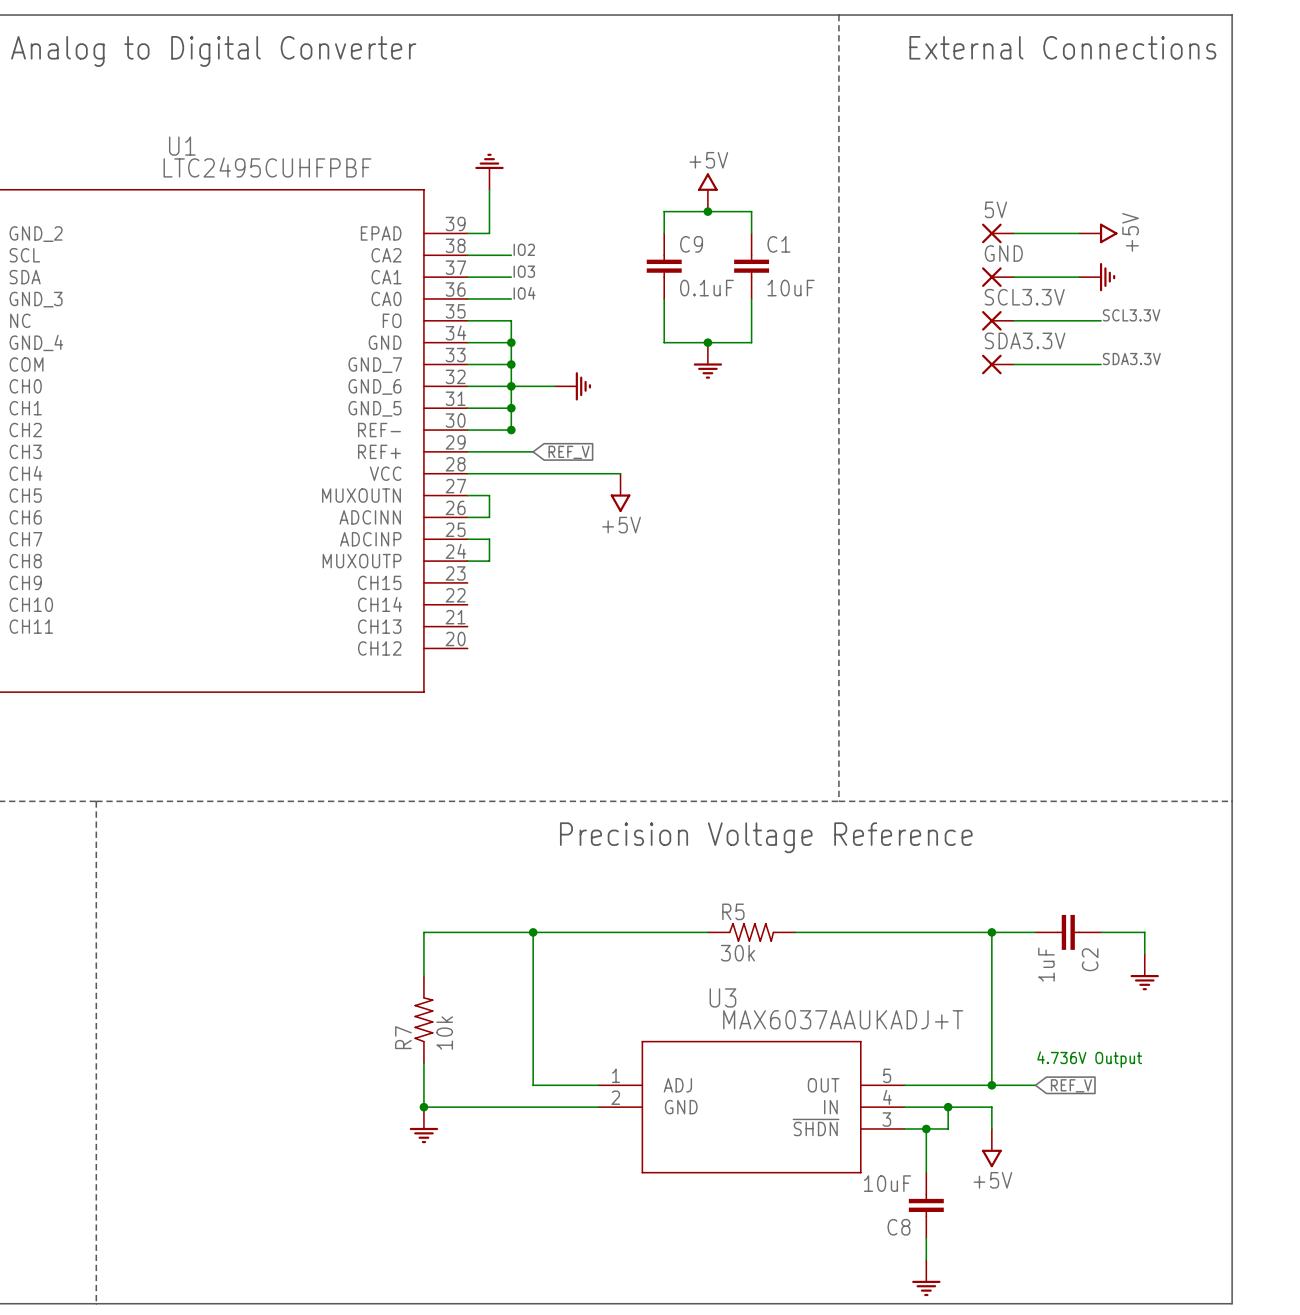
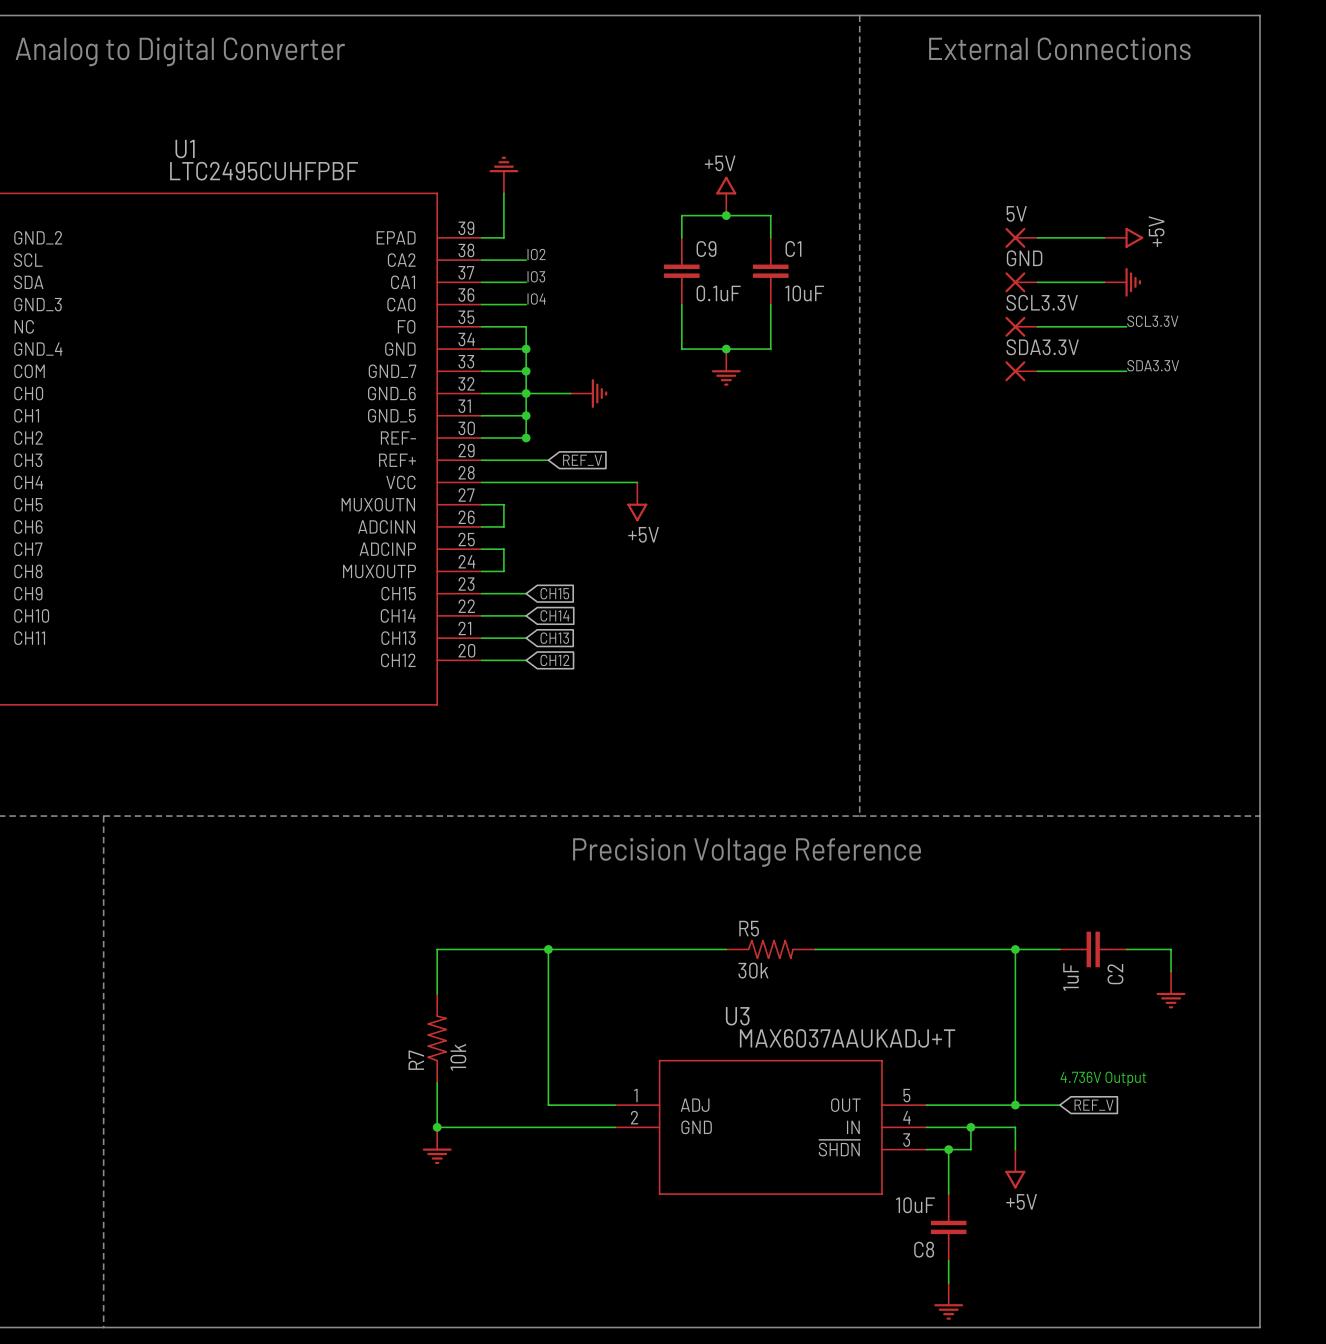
wire: none -> (481, 593) (526, 593)
global label: none -> CH15 (554, 593)
wire: none -> (481, 615) (526, 615)
global label: none -> CH14 (555, 615)
wire: none -> (481, 638) (526, 638)
global label: none -> CH13 (554, 638)
wire: none -> (481, 660) (526, 660)
global label: none -> CH12 (554, 660)

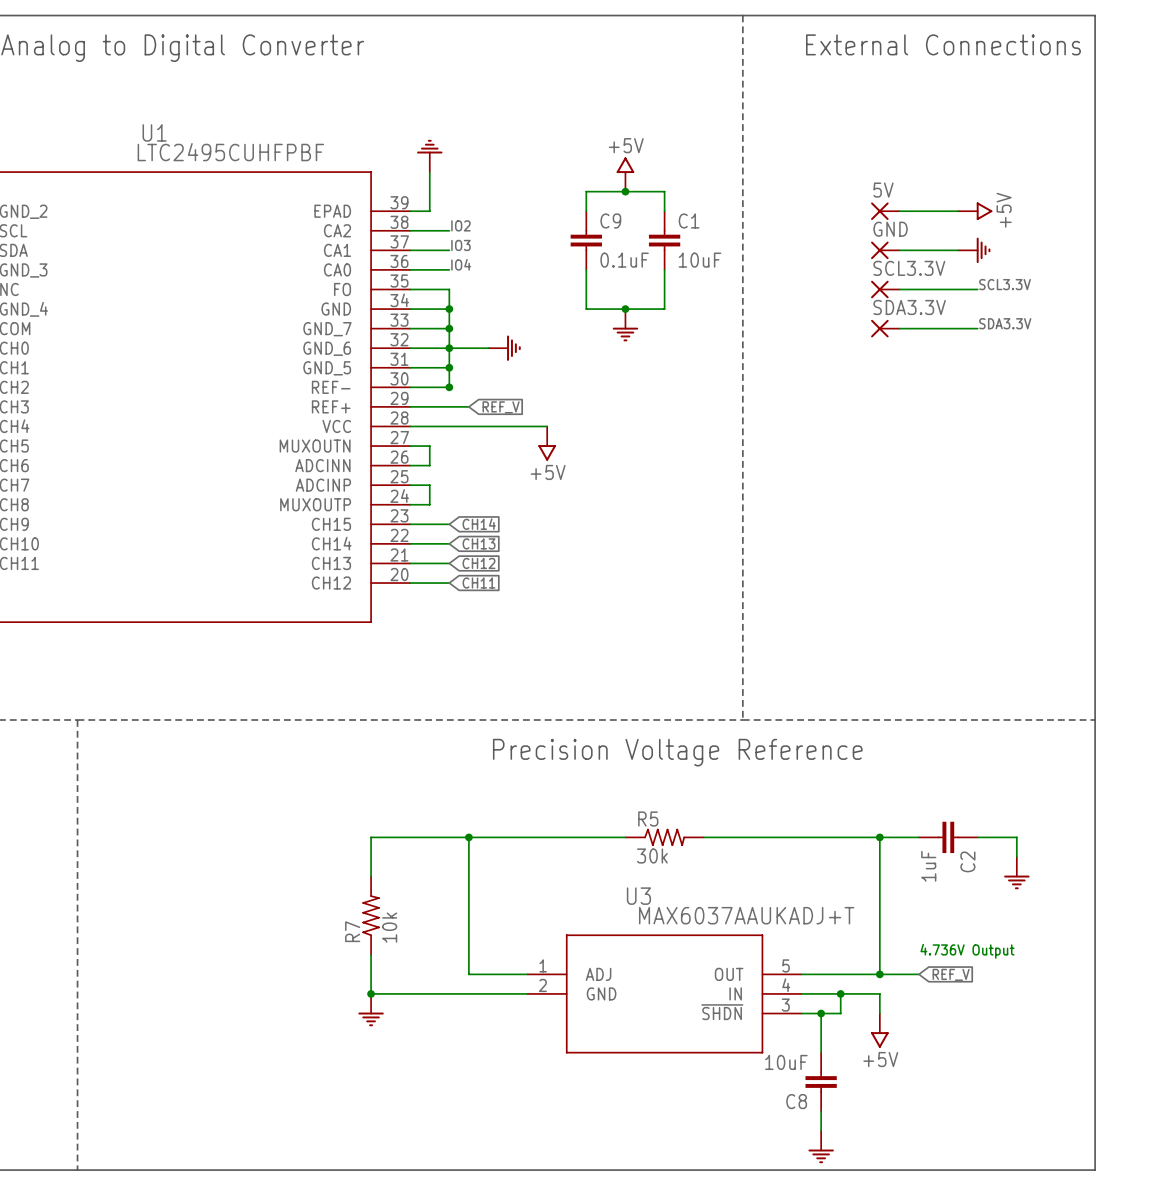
global label: CH15 (554, 593) -> CH14 (479, 524)
global label: CH14 (555, 615) -> CH13 (478, 543)
global label: CH13 (554, 638) -> CH12 (478, 563)
global label: CH12 (554, 660) -> CH11 (478, 583)

